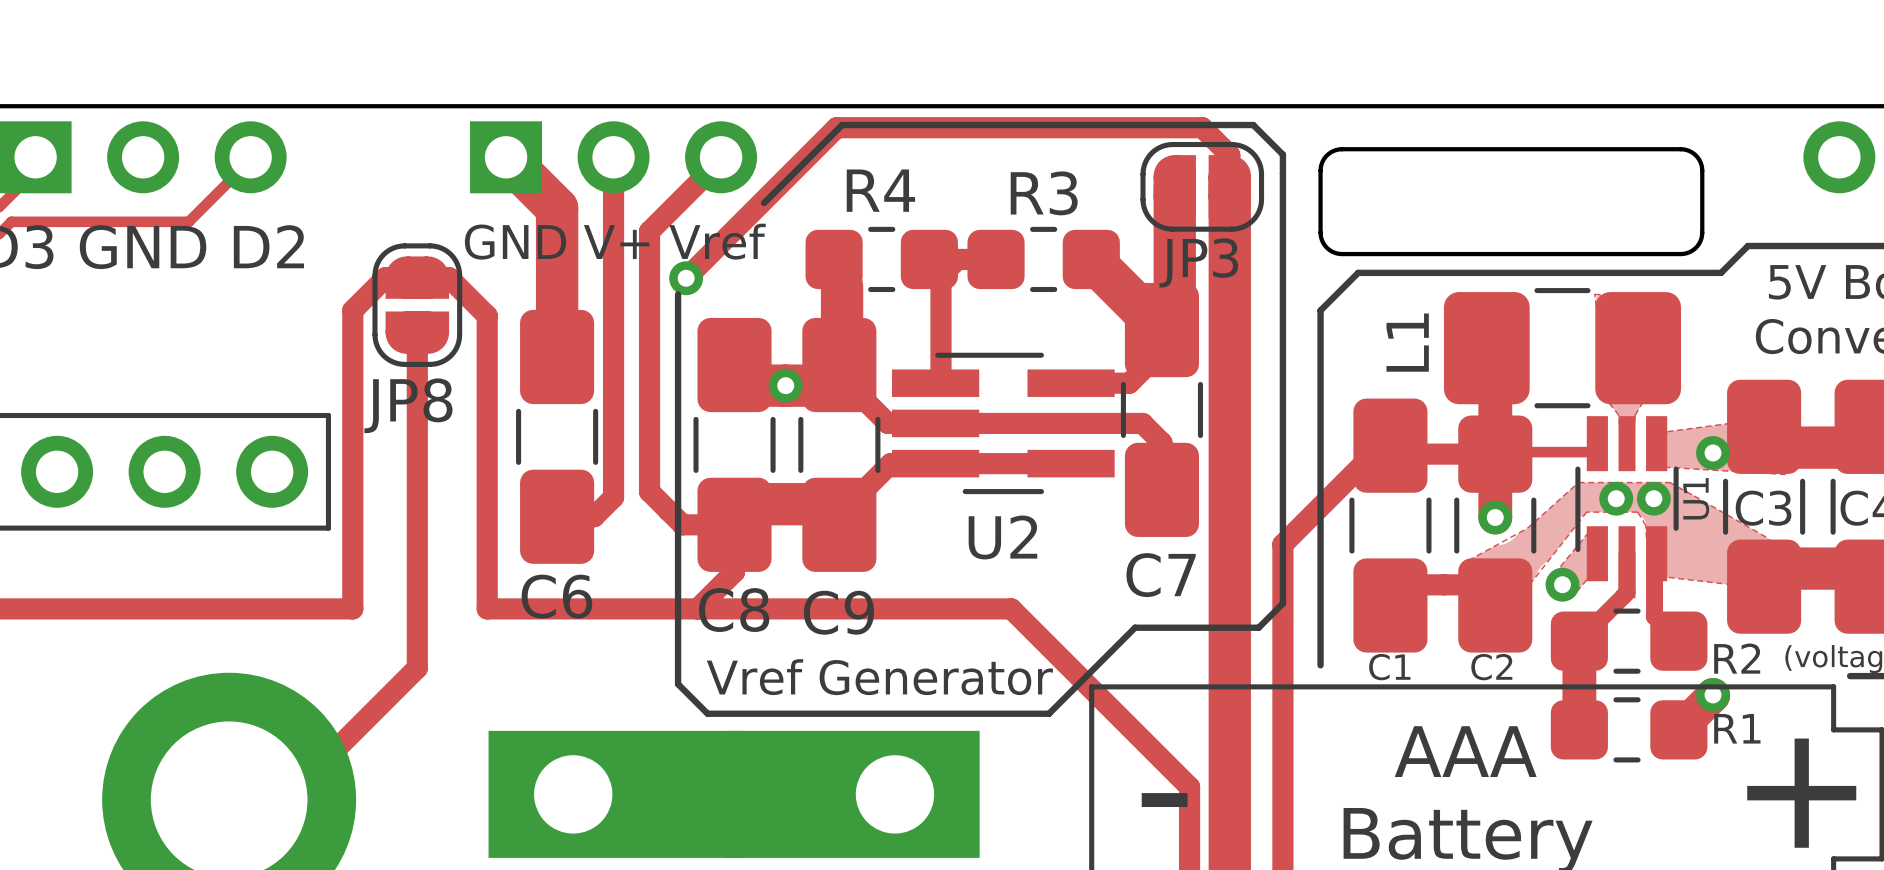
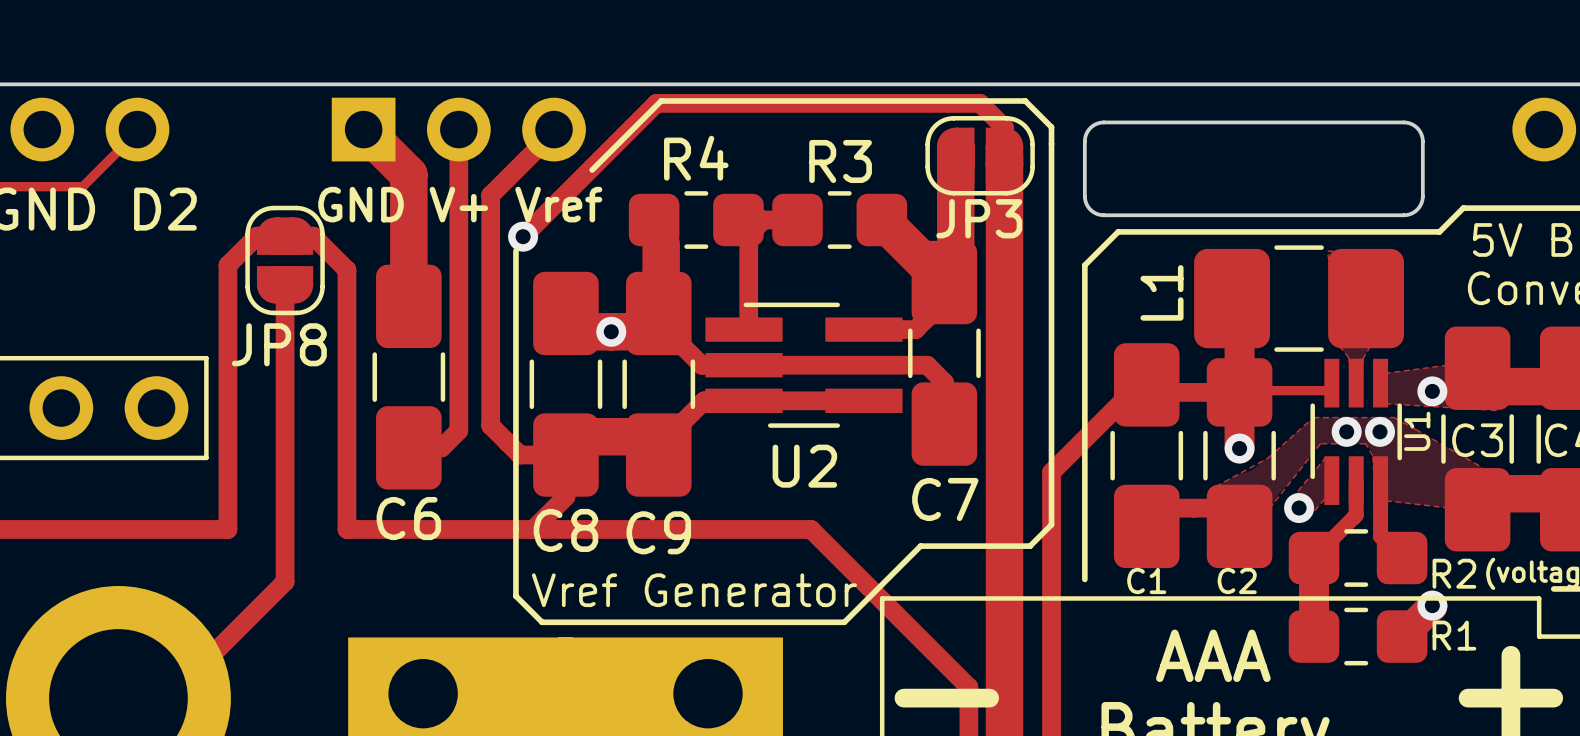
U1 footprint: [1575, 416, 1679, 599] -> [1310, 358, 1402, 505]

